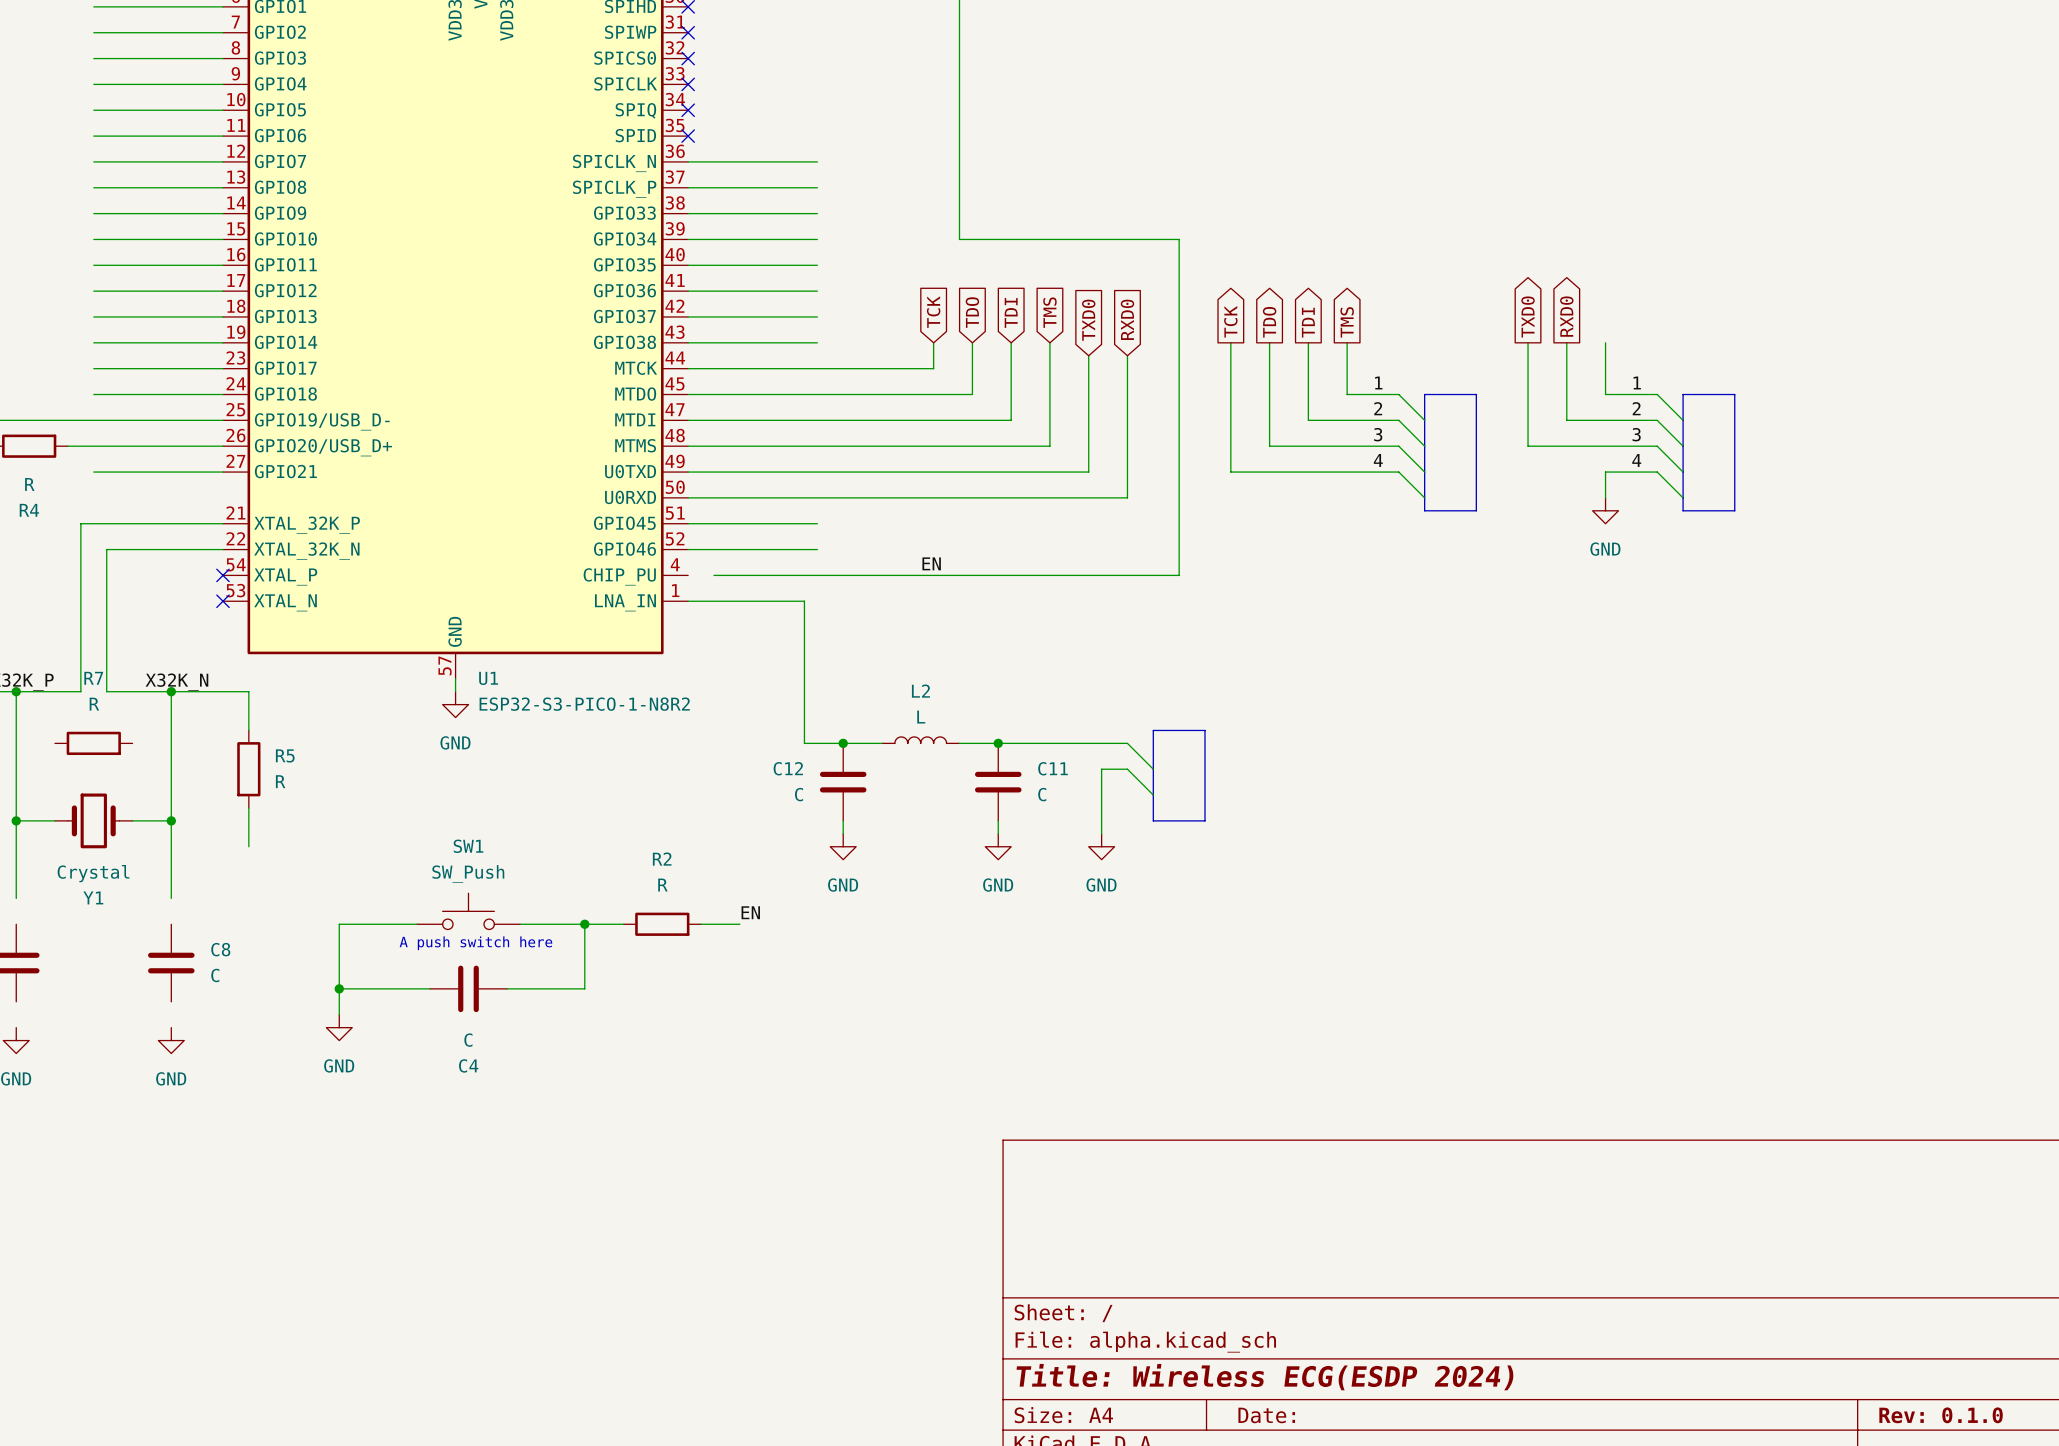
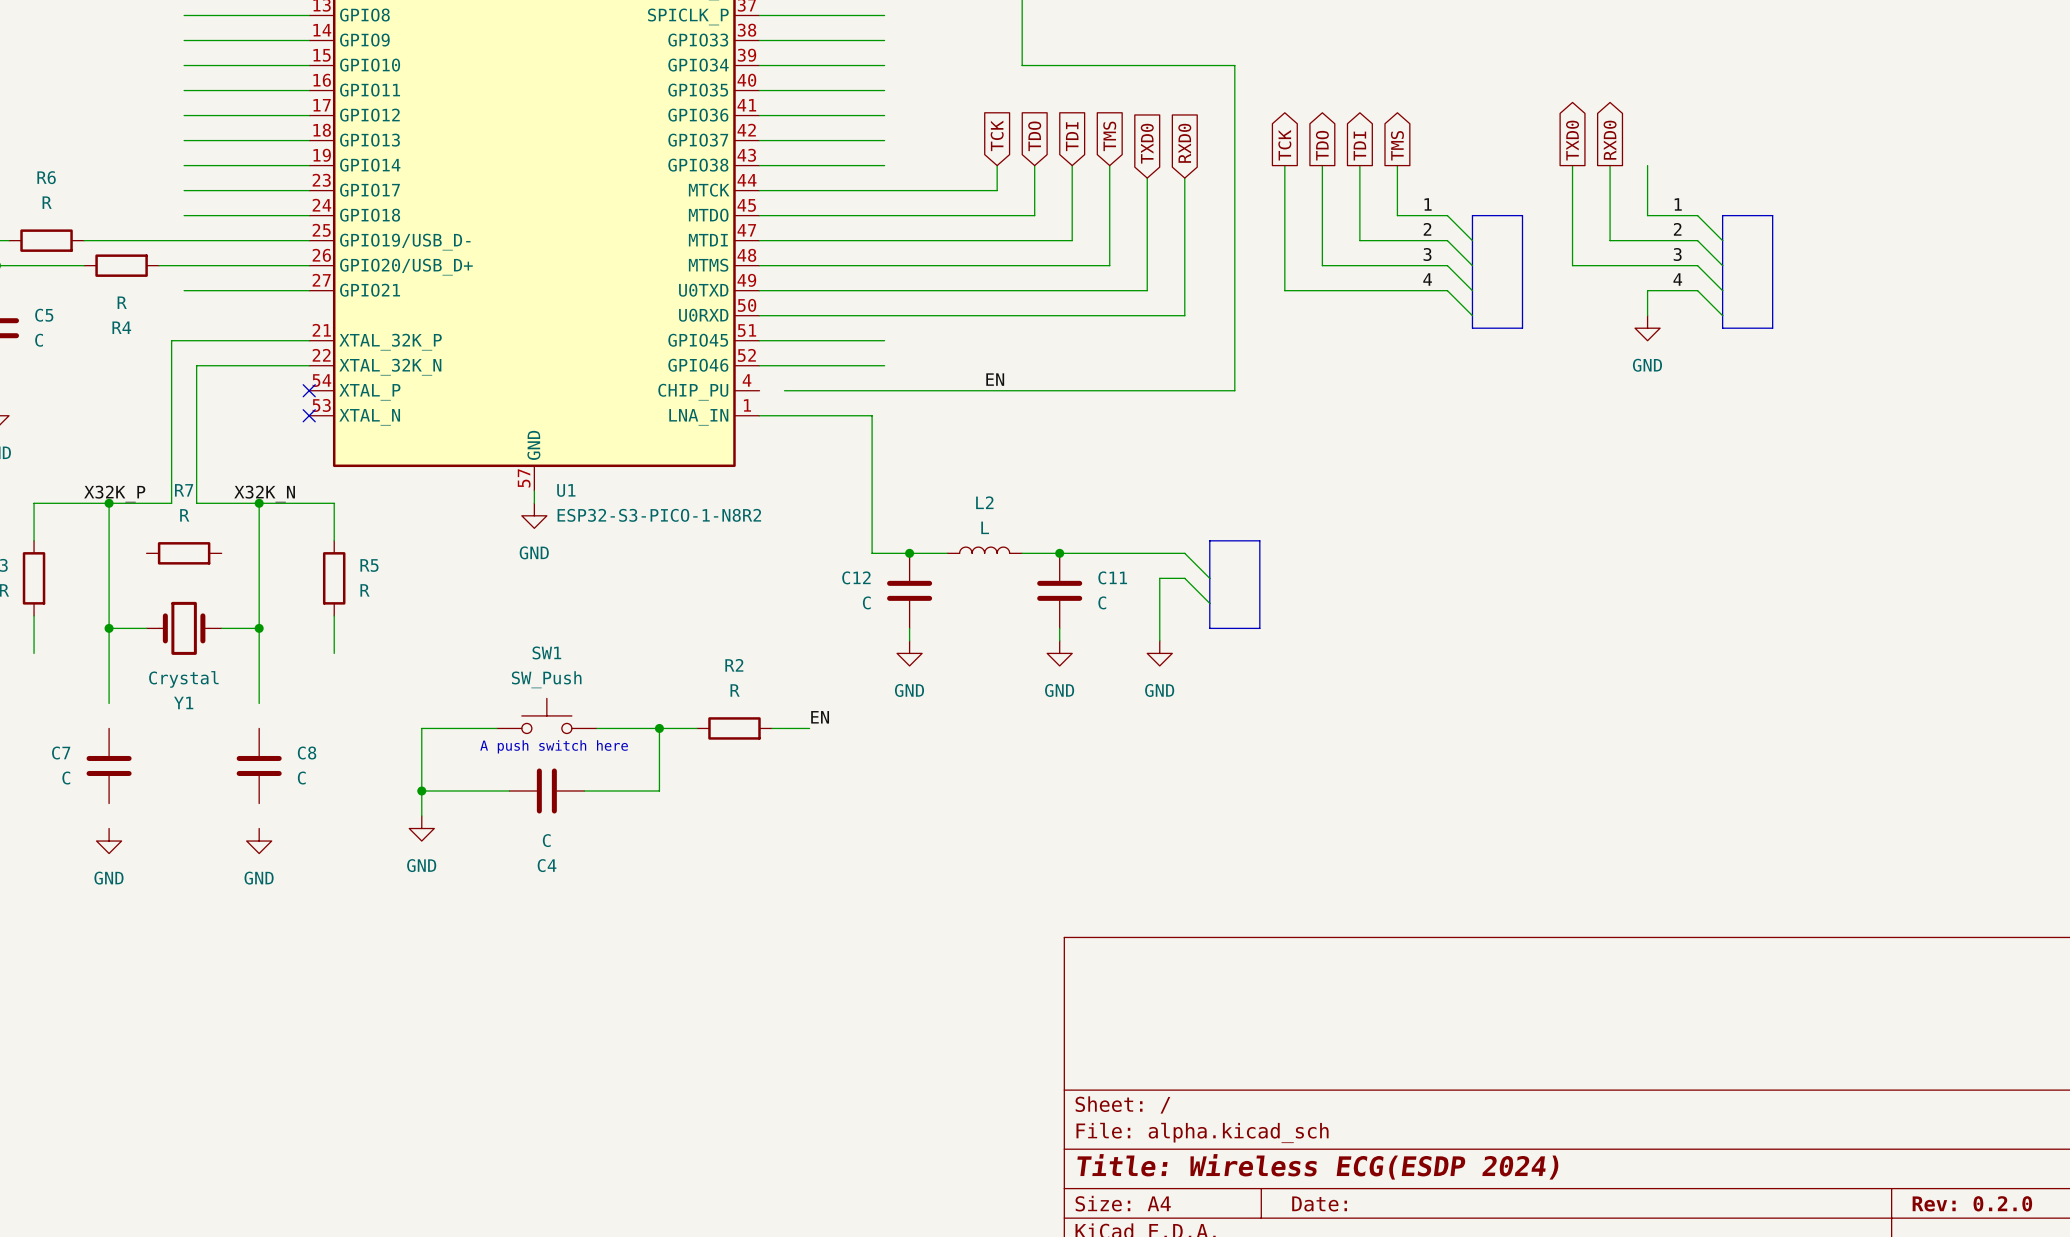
title block: Rev: 0.1.0 (1941, 1415) -> Rev: 0.2.0 (1972, 1203)

